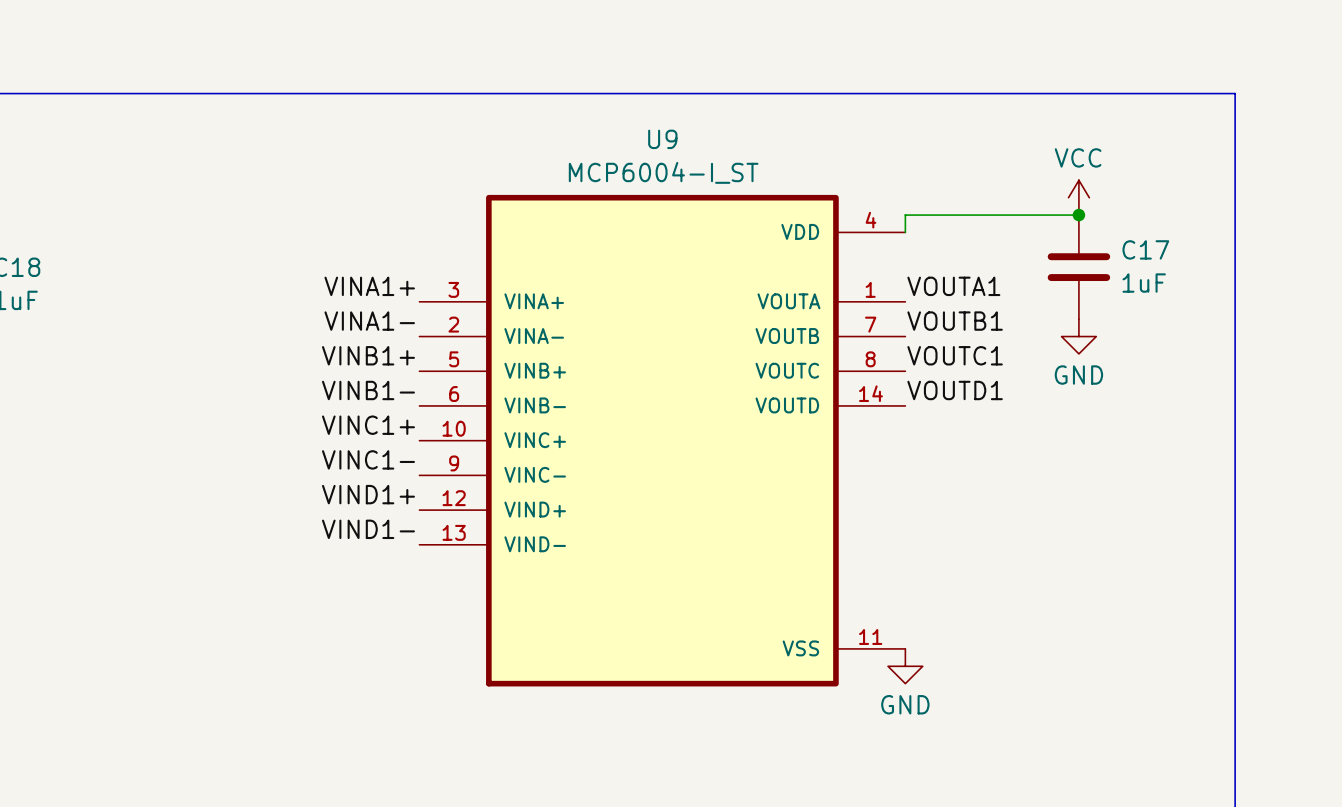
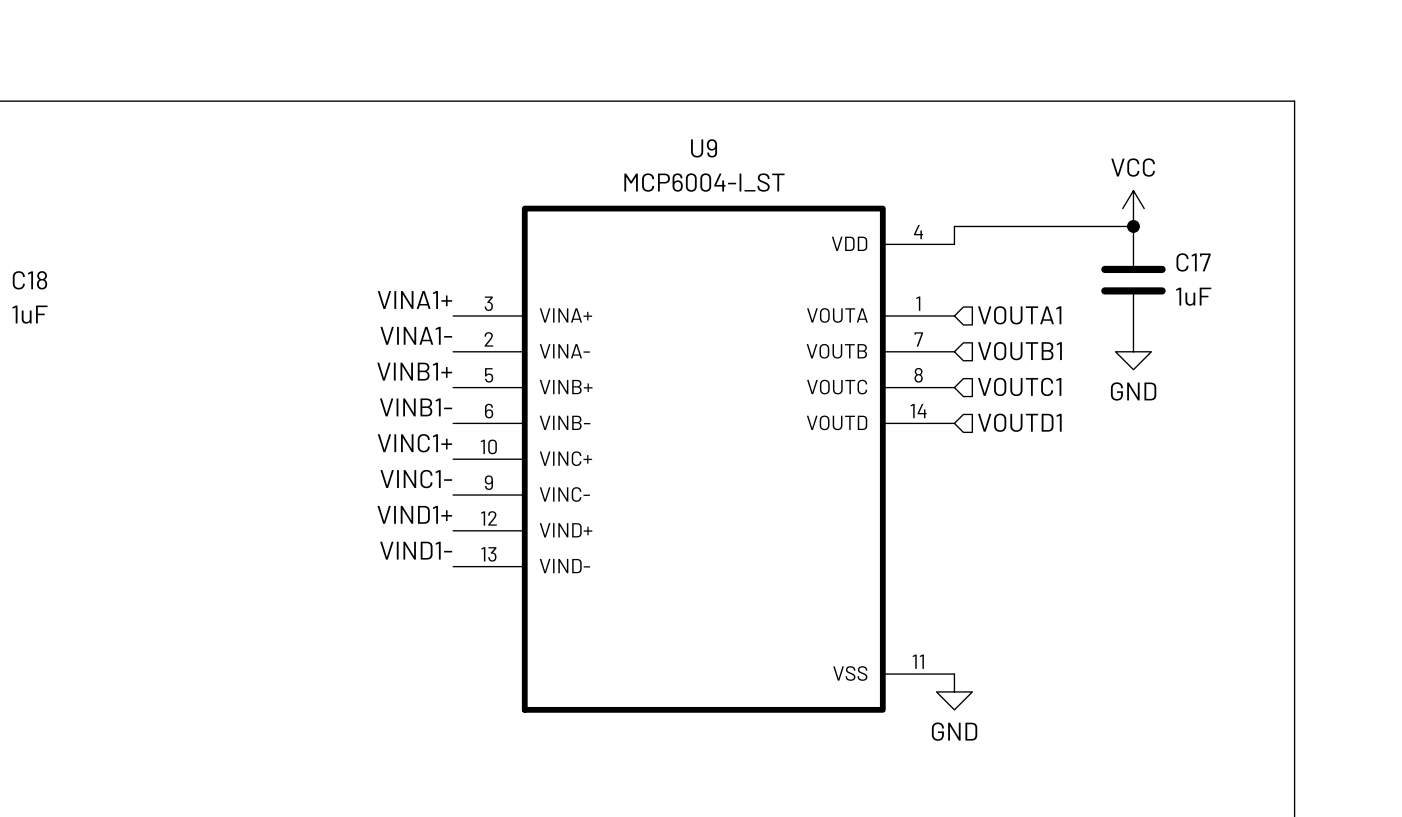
label: VOUTA1 (953, 286) -> none
hierarchical label: none -> VOUTA1 (1019, 315)
label: VOUTB1 (955, 321) -> none
hierarchical label: none -> VOUTB1 (1019, 351)
label: VOUTC1 (955, 355) -> none
hierarchical label: none -> VOUTC1 (1019, 386)
label: VOUTD1 (955, 390) -> none
hierarchical label: none -> VOUTD1 (1019, 422)

